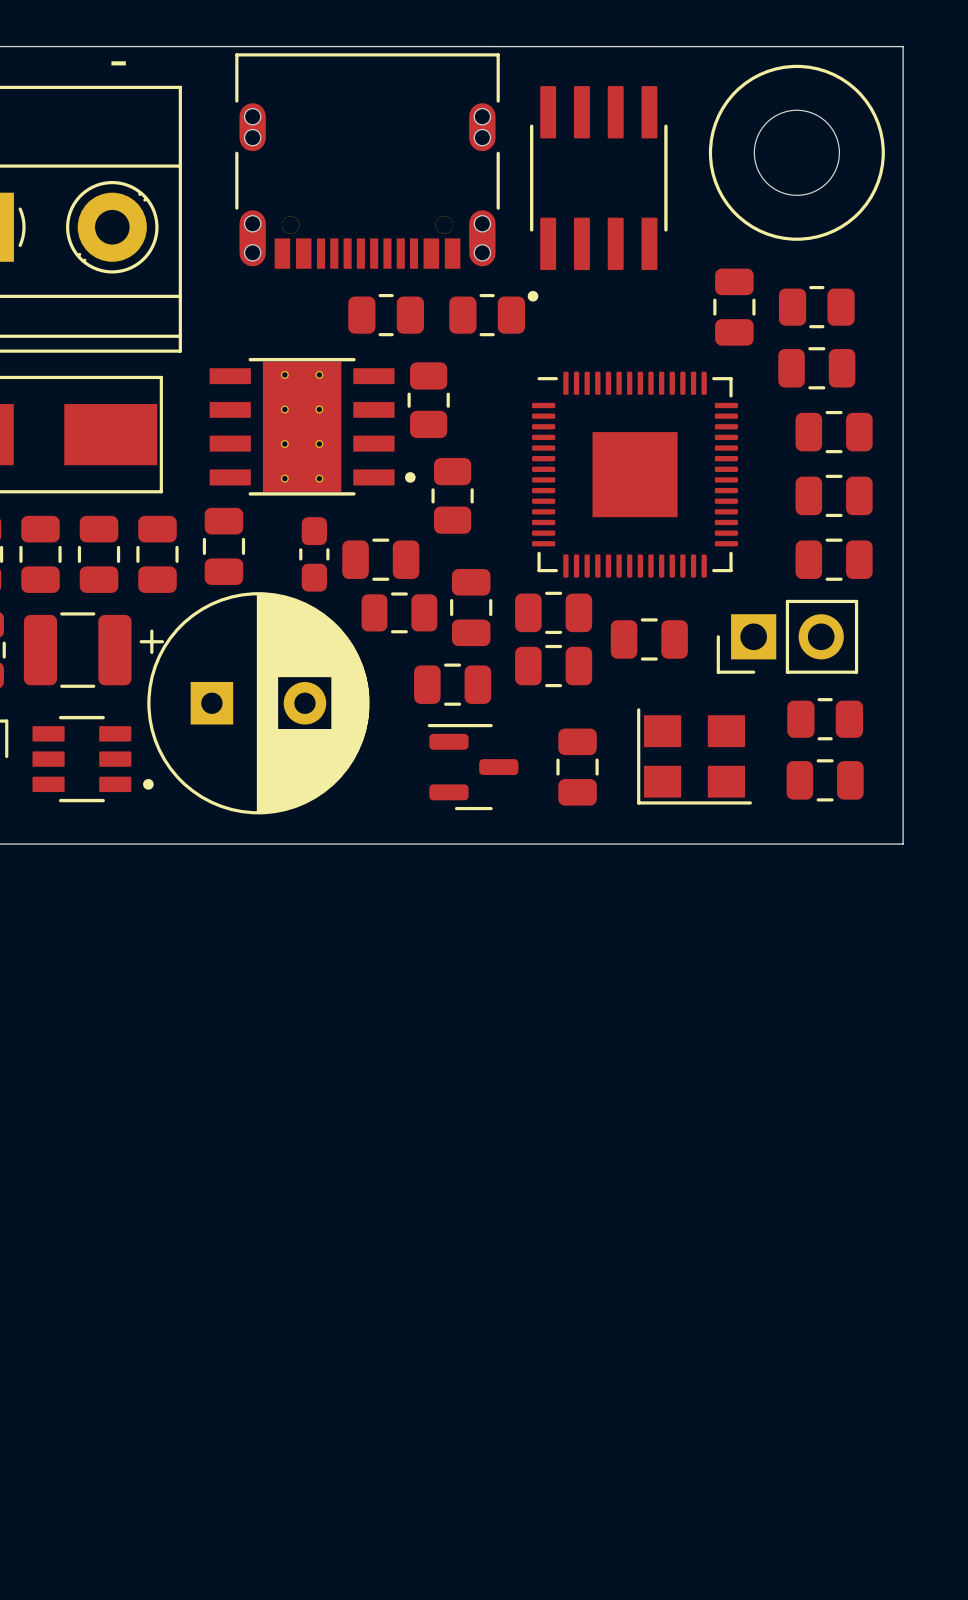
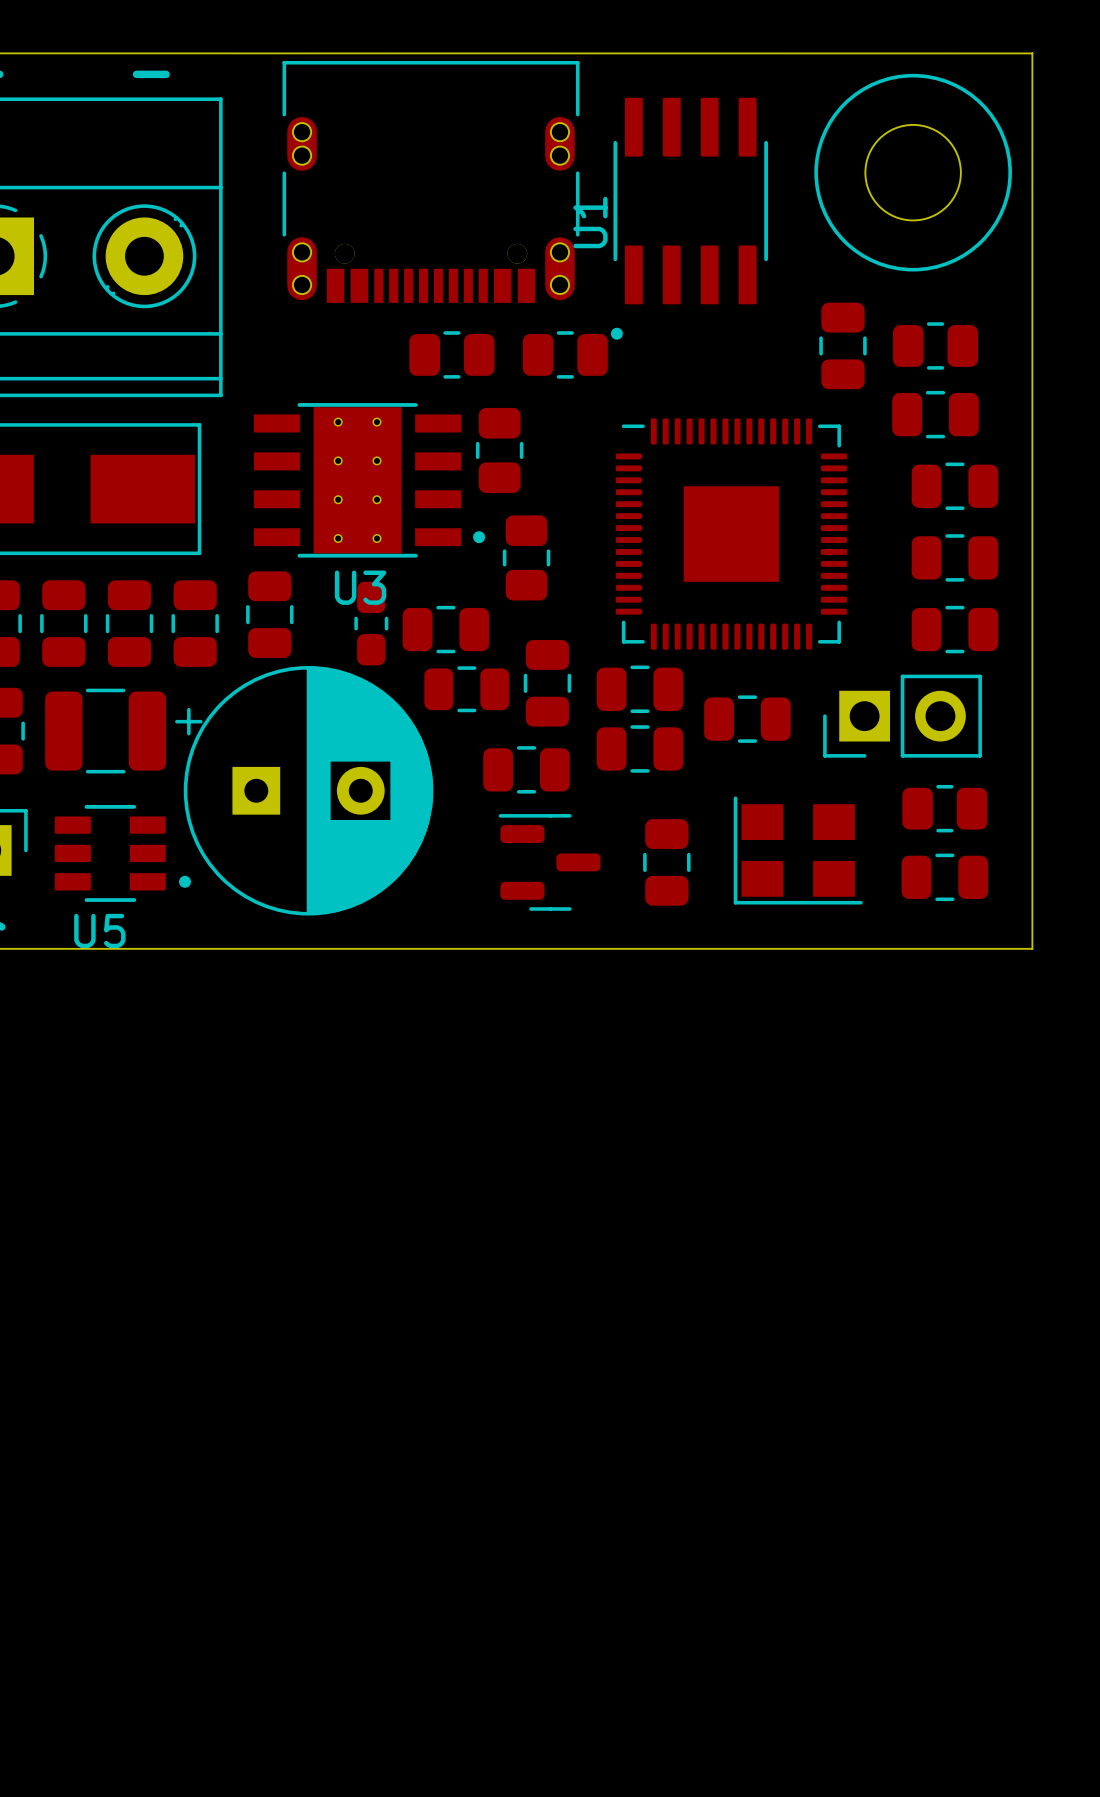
U1 name: none -> U1 (590, 222)
U3 name: none -> U3 (360, 587)
U5 name: none -> U5 (99, 931)

